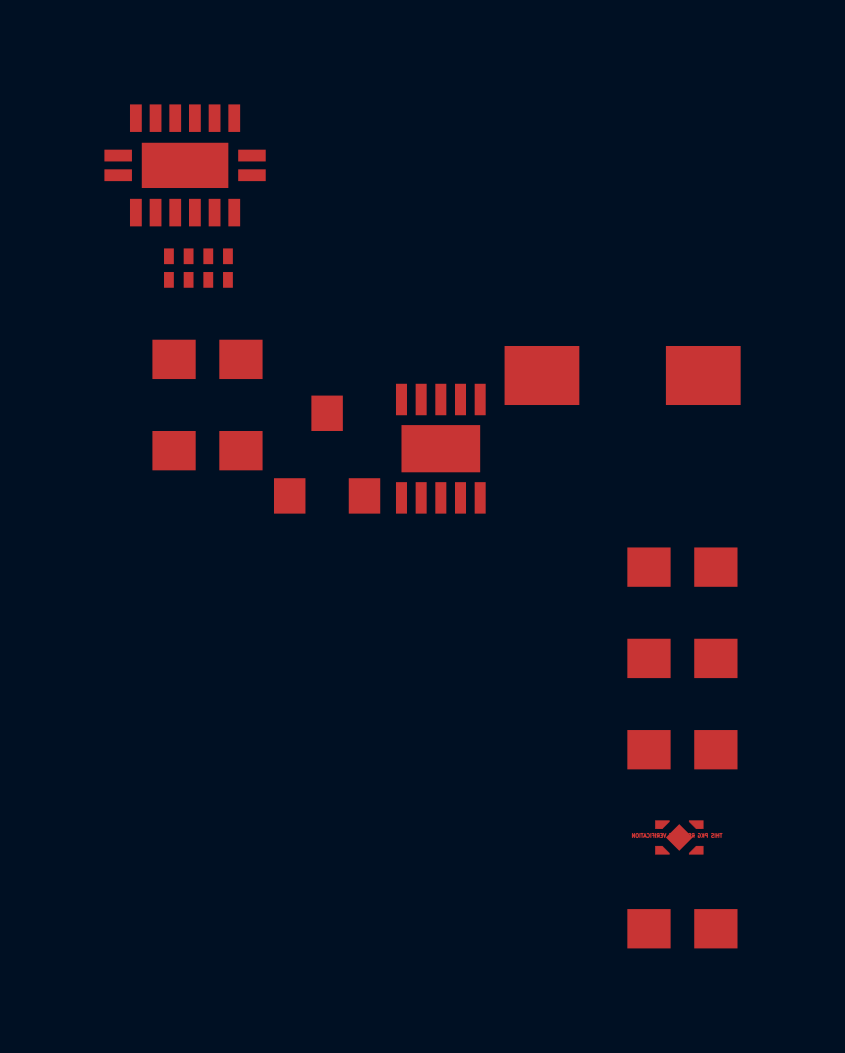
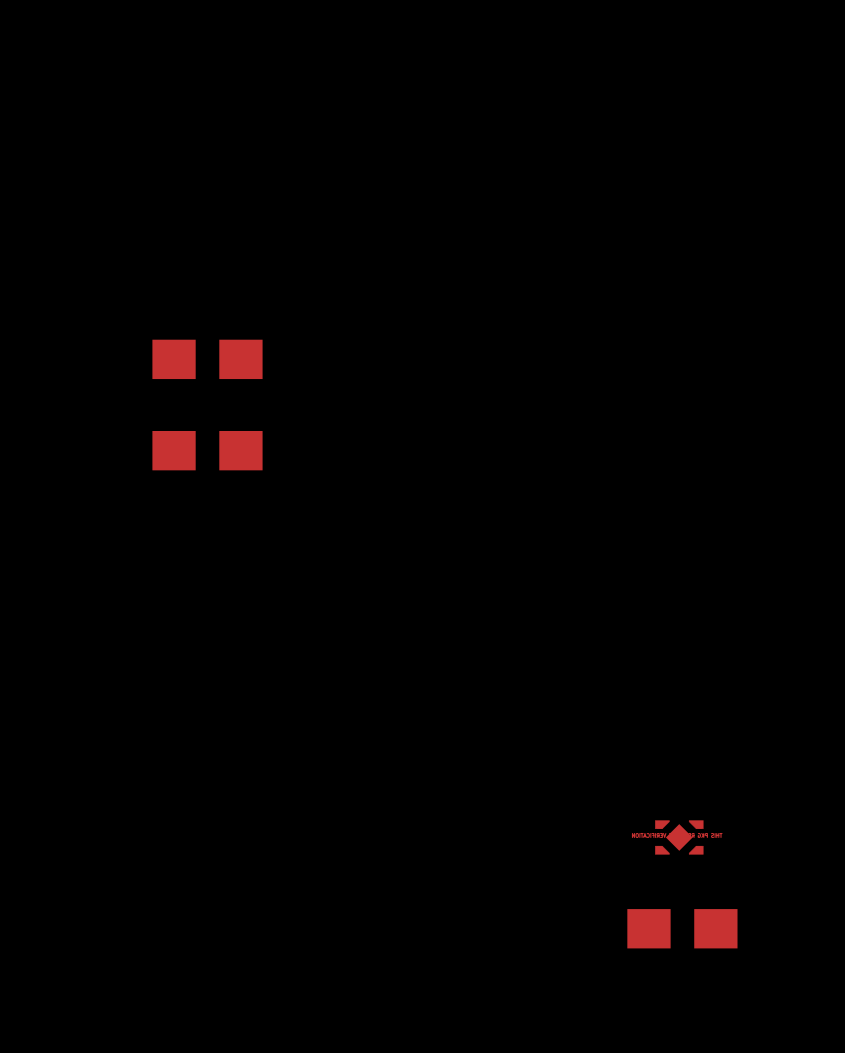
part: (185, 165) -> none
part: (198, 268) -> none
part: (622, 375) -> none
part: (440, 448) -> none
part: (327, 454) -> none
part: (682, 567) -> none
part: (682, 658) -> none
part: (682, 749) -> none

